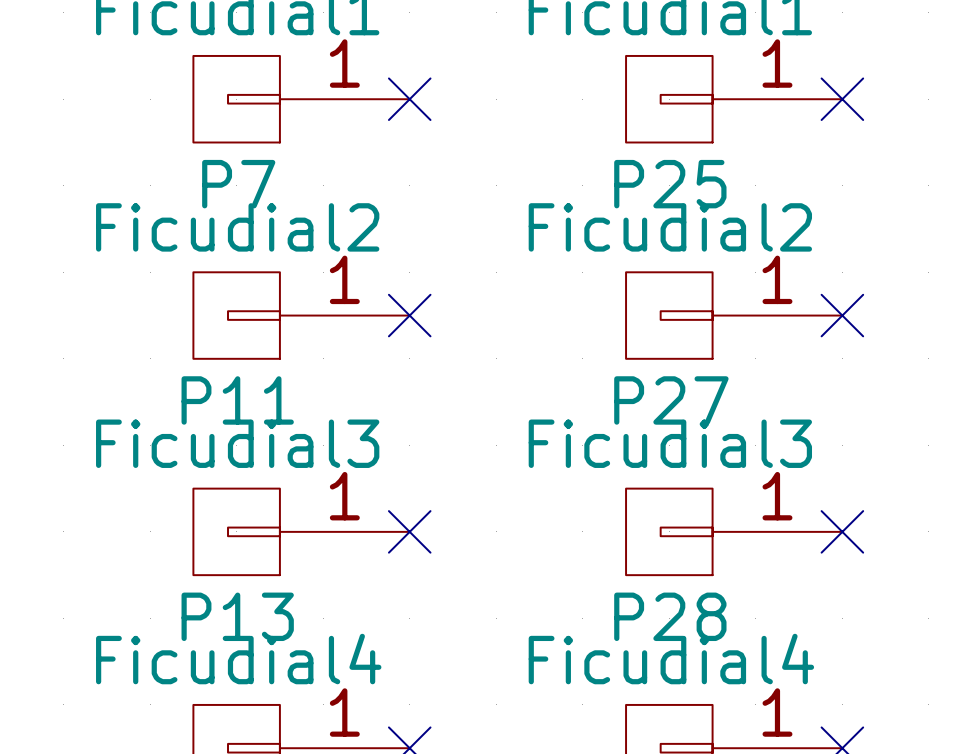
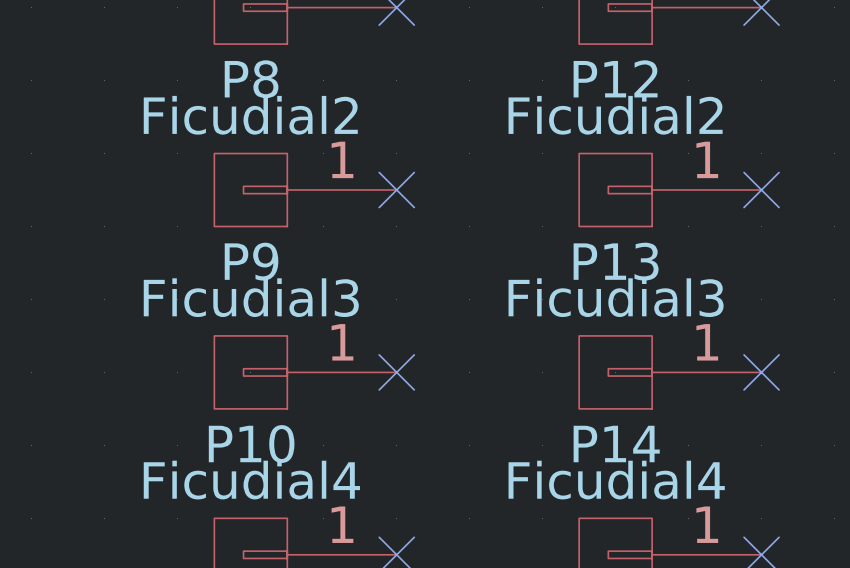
P7 name: P7 (238, 184) -> P8 (251, 79)
P25 name: P25 (670, 184) -> P12 (615, 78)
P11 name: P11 (237, 400) -> P9 (251, 261)
P27 name: P27 (671, 400) -> P13 (616, 261)
P13 name: P13 (237, 616) -> P10 (251, 444)
P28 name: P28 (670, 616) -> P14 (616, 444)

